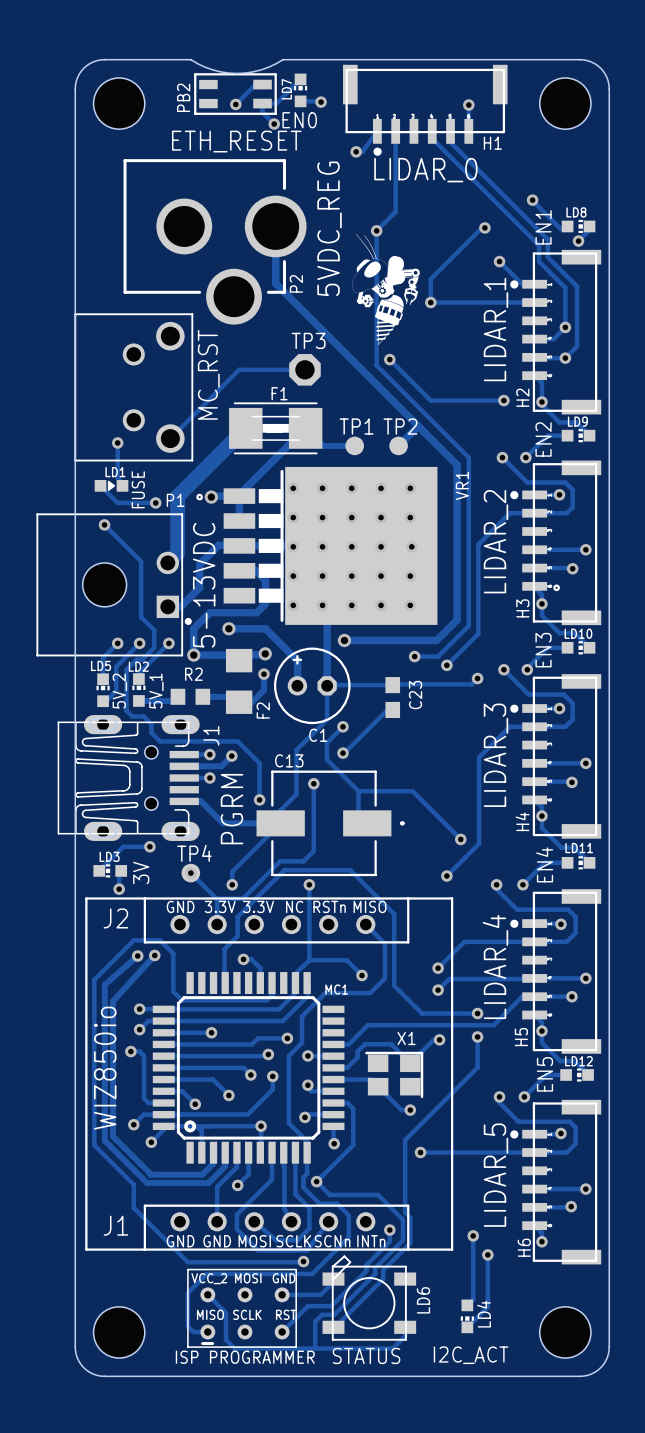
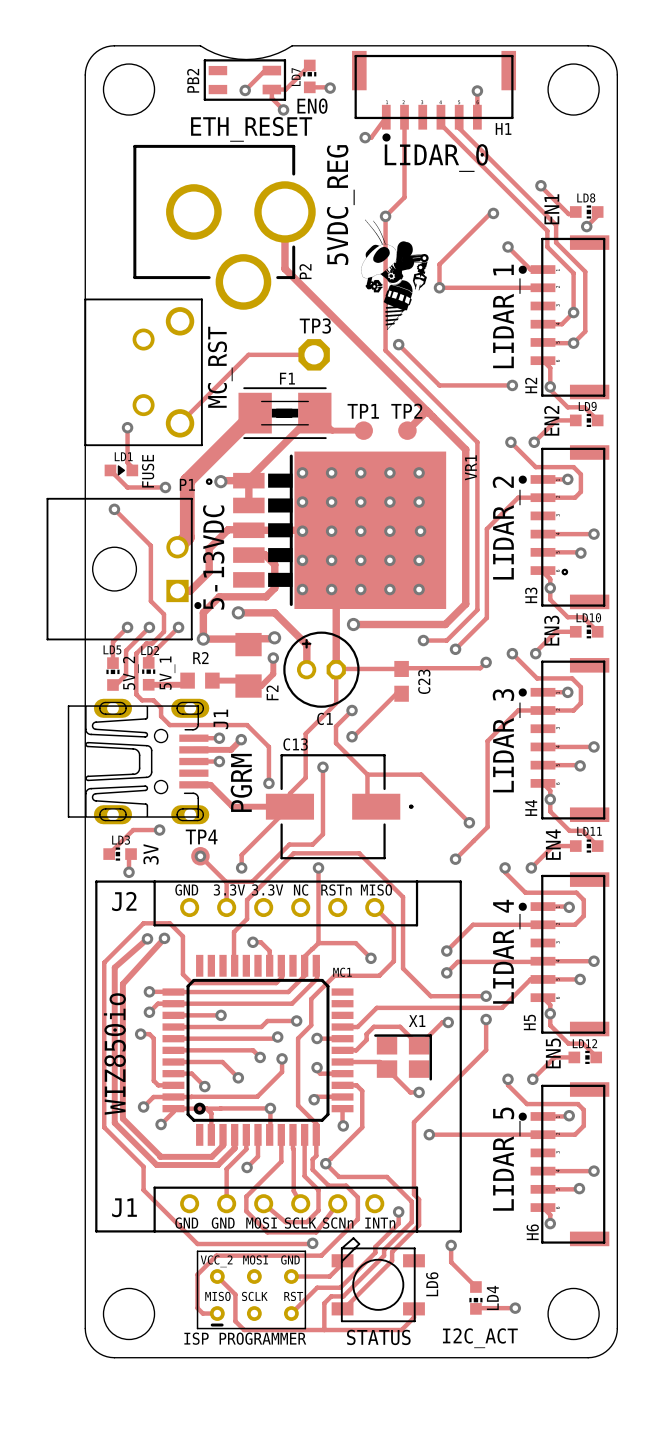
track: (473, 1235) (473, 1299) (467, 1305) -> (451, 1245) (451, 1262) (475, 1287)
via: (473, 1235) -> none
track: (487, 1254) (487, 1306) (468, 1326) -> (515, 1308) (476, 1308)
via: (487, 1254) -> none
via: none -> (451, 1245)
via: none -> (515, 1308)

